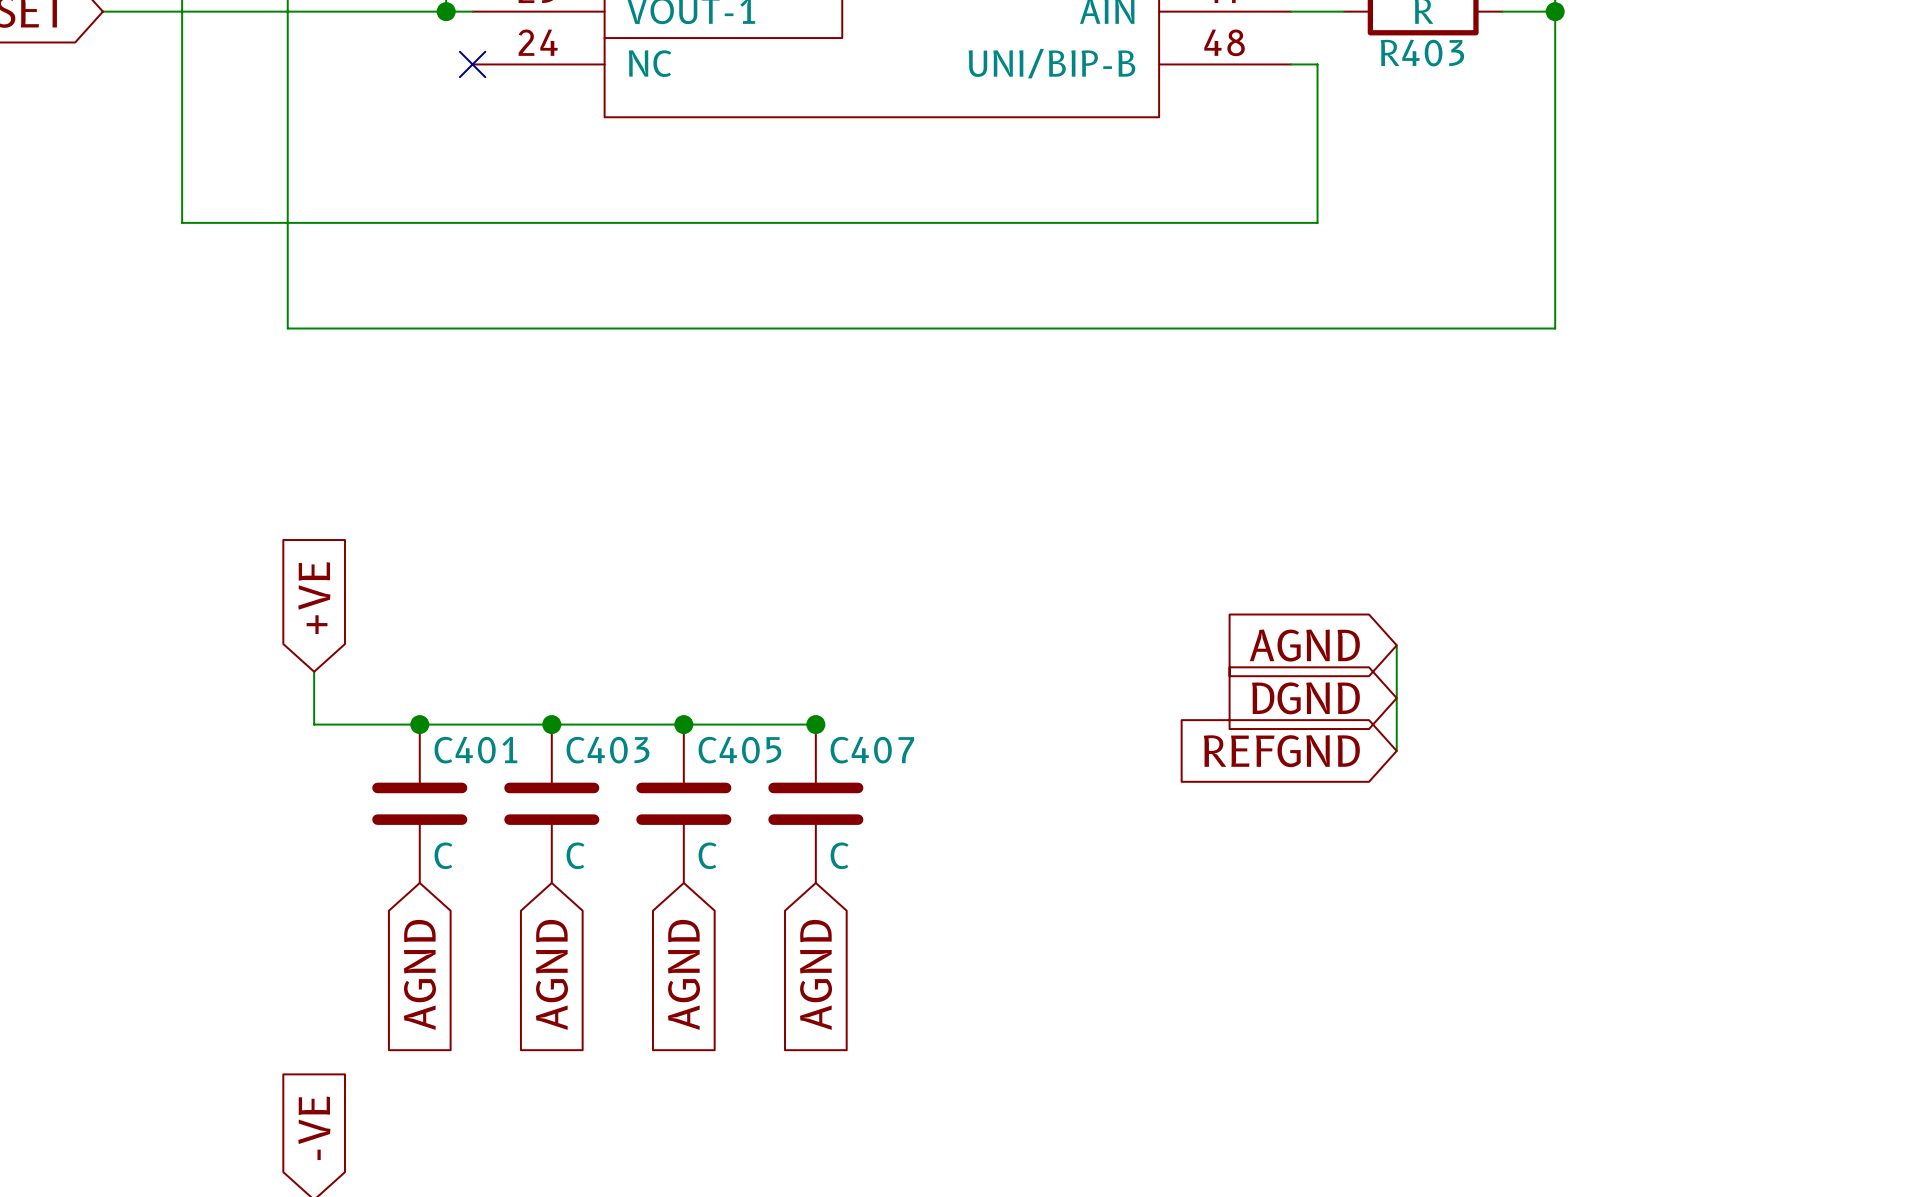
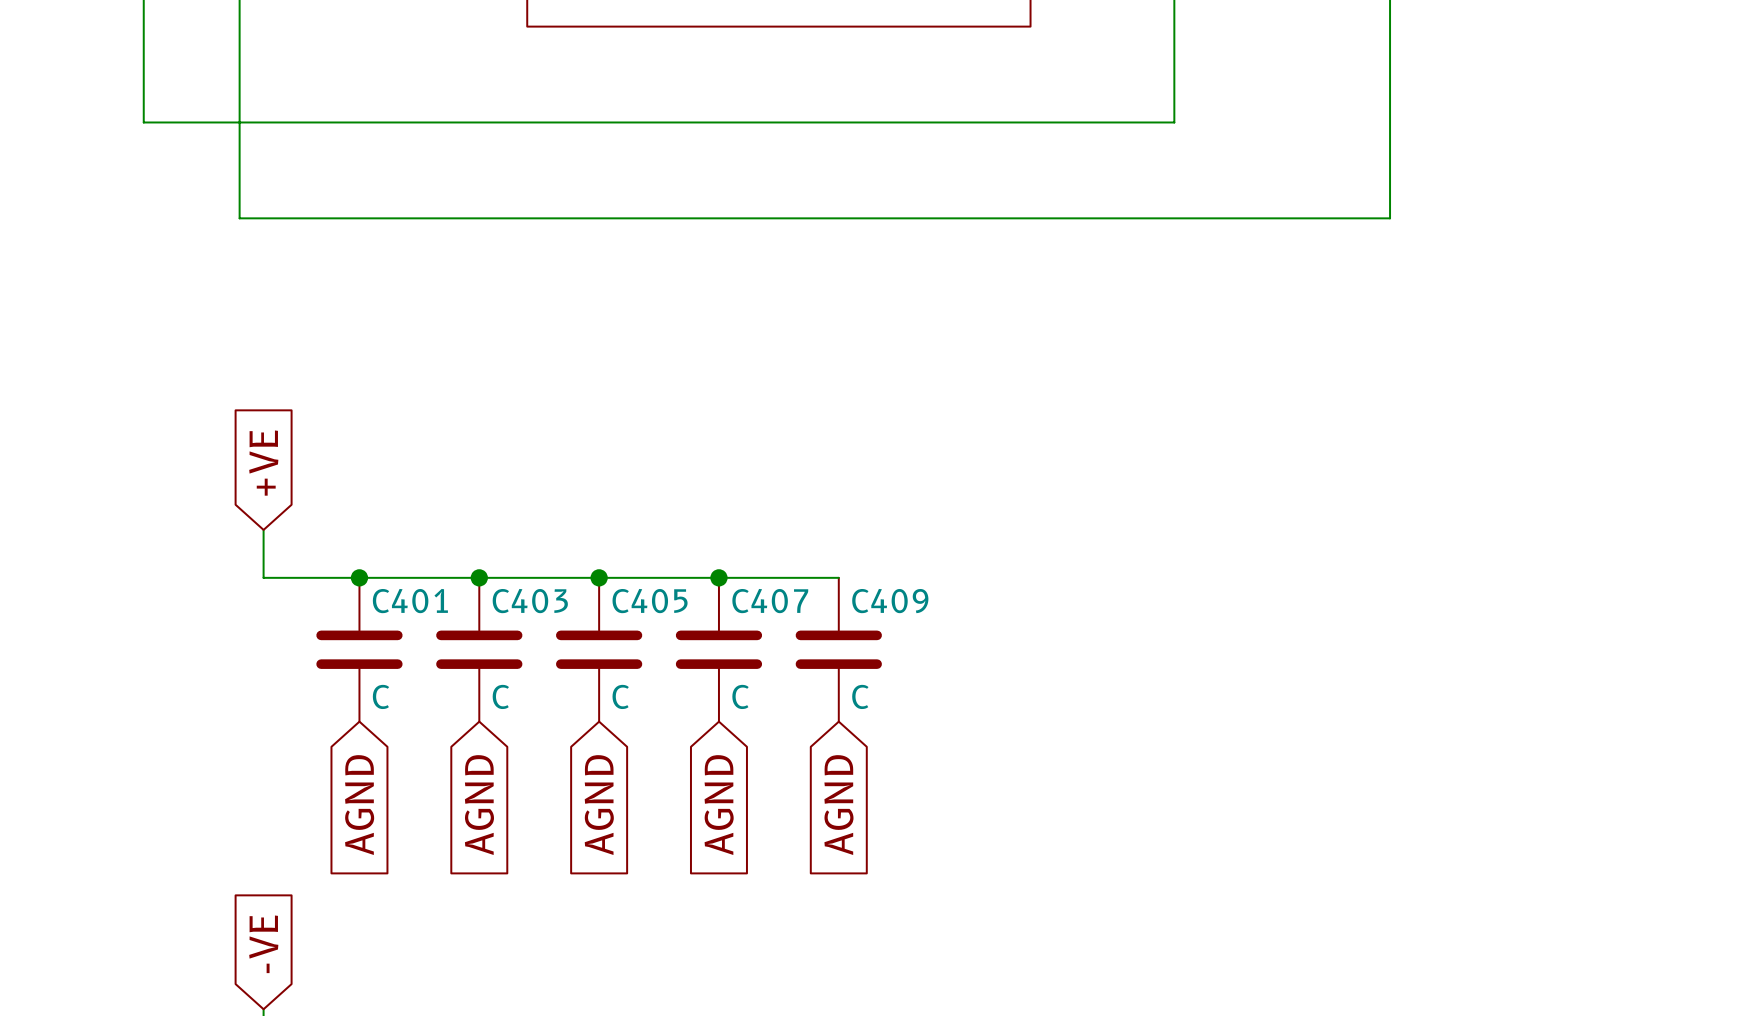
global label rotation: 0° (1304, 645) -> 90° counterclockwise (838, 805)
global label position: AGND (1304, 645) -> AGND (838, 805)
wire: (1396, 645) (1396, 750) -> none
global label: DGND (1305, 698) -> none
wire: none -> (718, 577) (838, 577)
global label: REFGND (1281, 751) -> none
C409: none -> C (838, 649)

